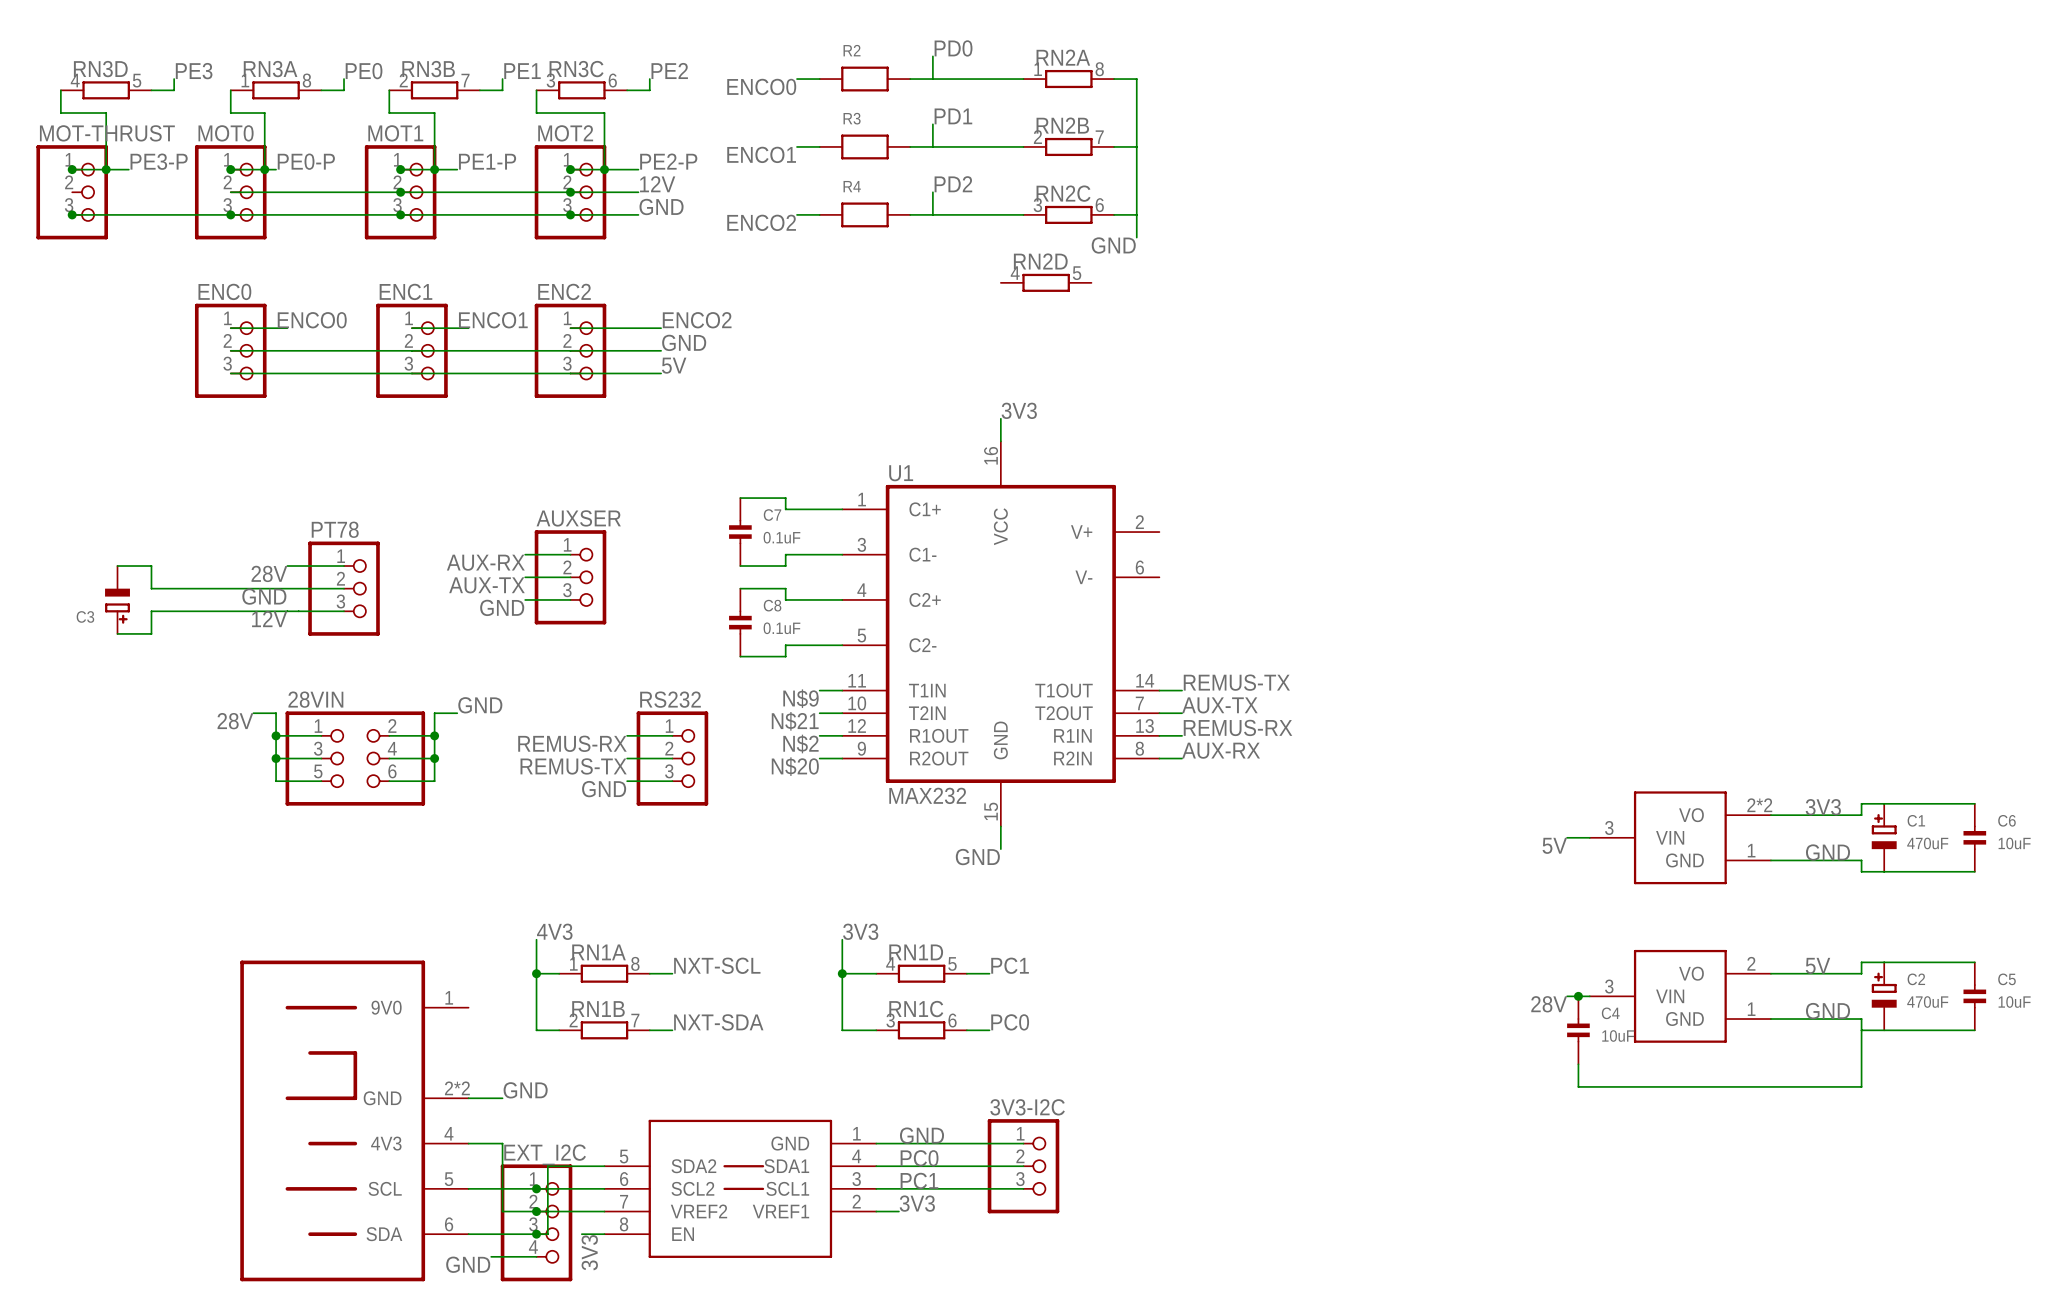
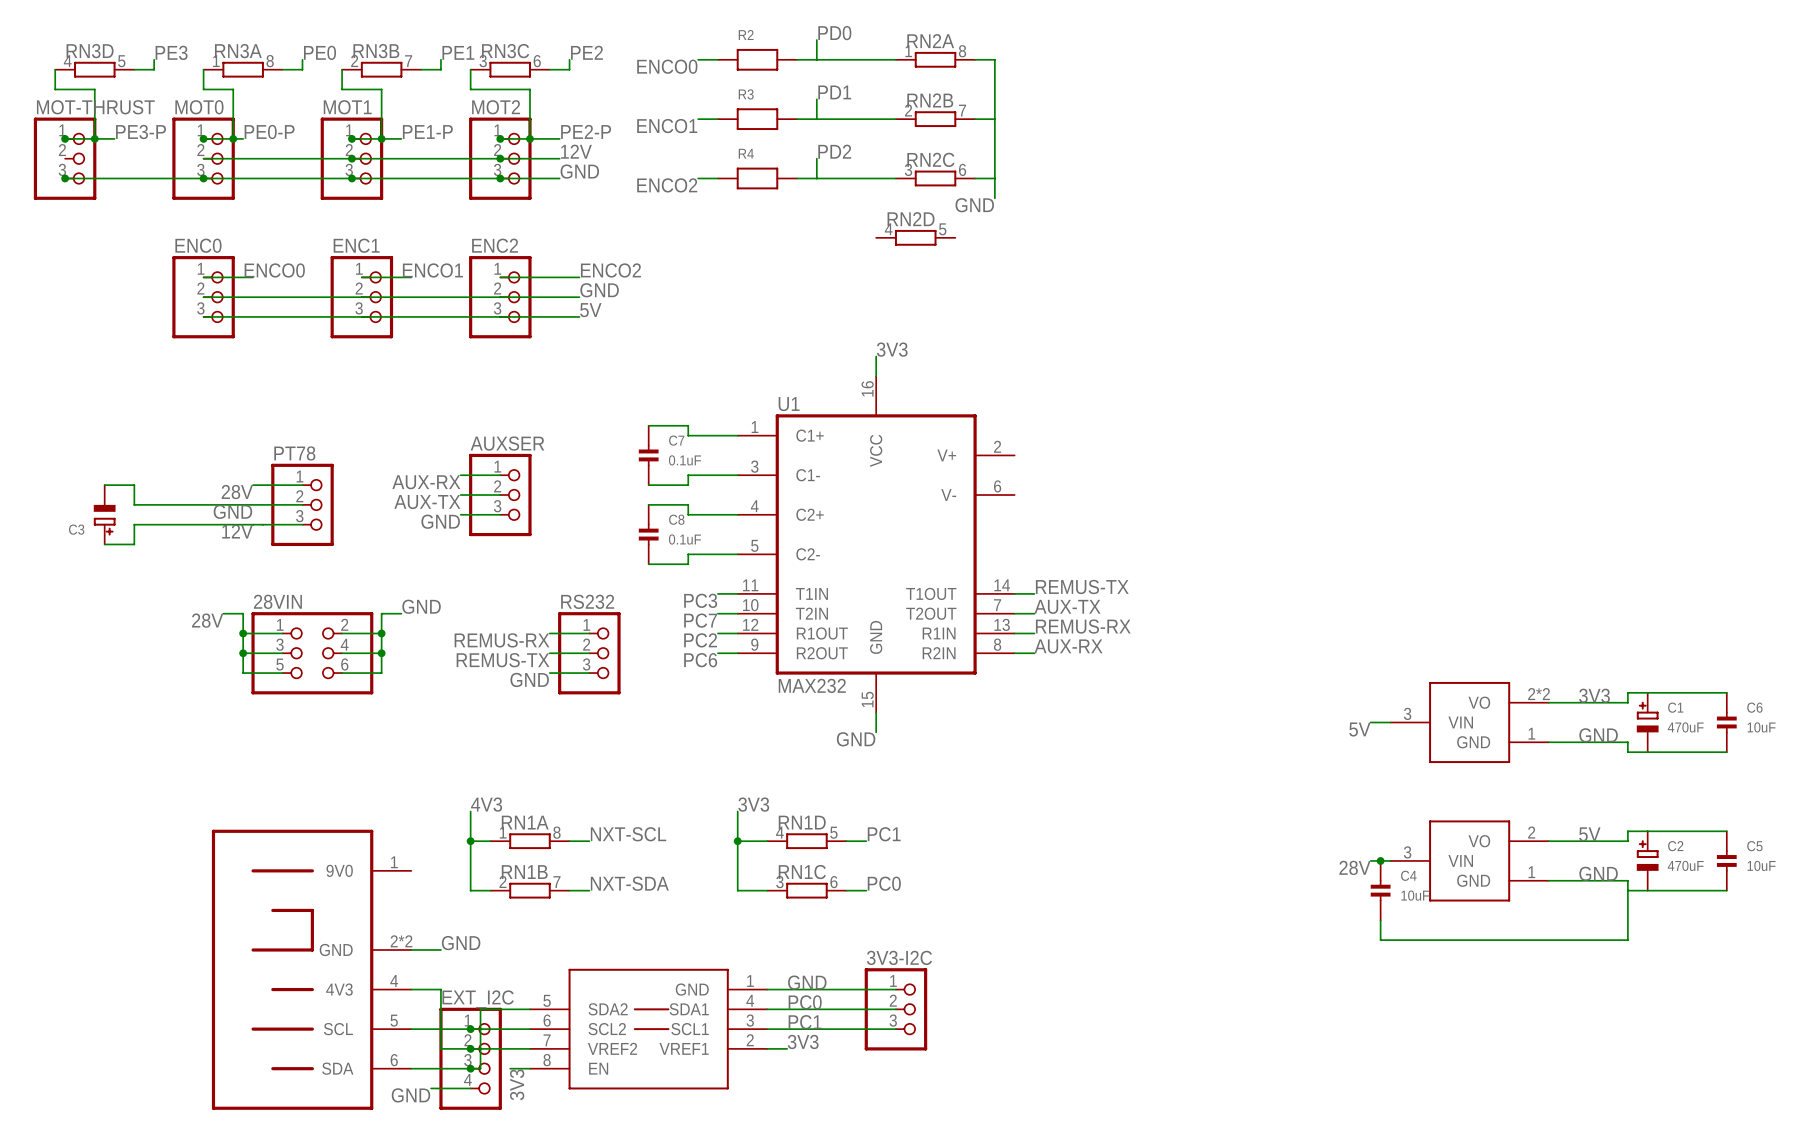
label: N$9 (800, 698) -> PC3 (700, 600)
label: N$21 (795, 721) -> PC7 (700, 620)
label: N$2 (800, 744) -> PC2 (700, 640)
label: N$20 (795, 766) -> PC6 (700, 660)

